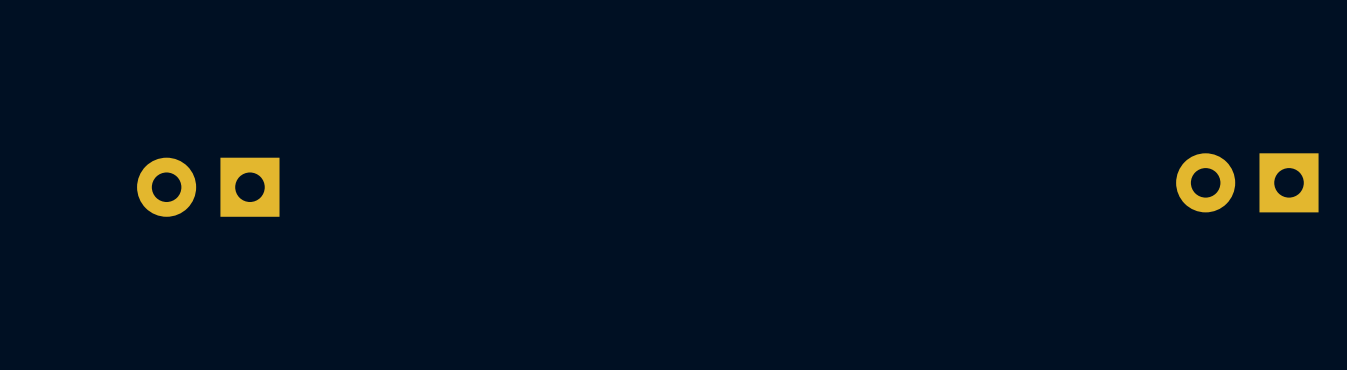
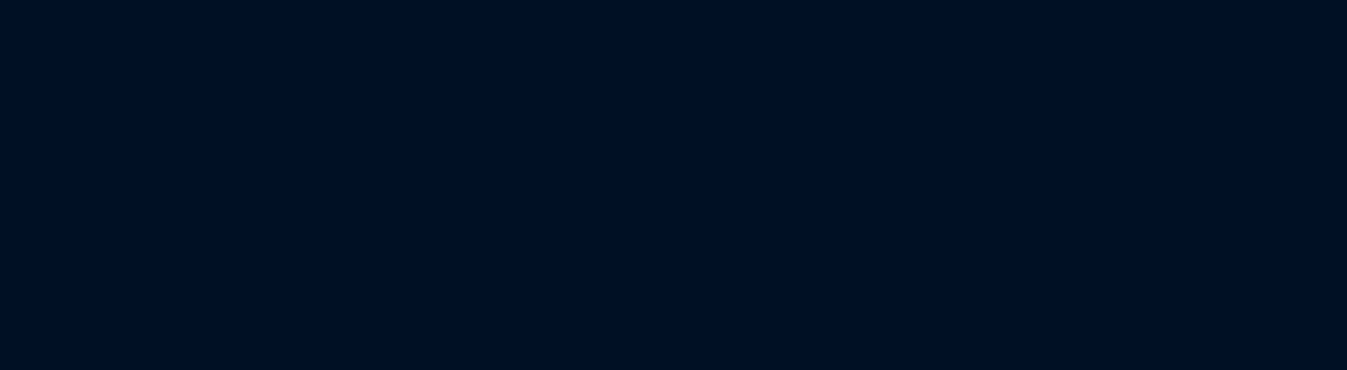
part: (1247, 182) -> none
part: (208, 187) -> none

